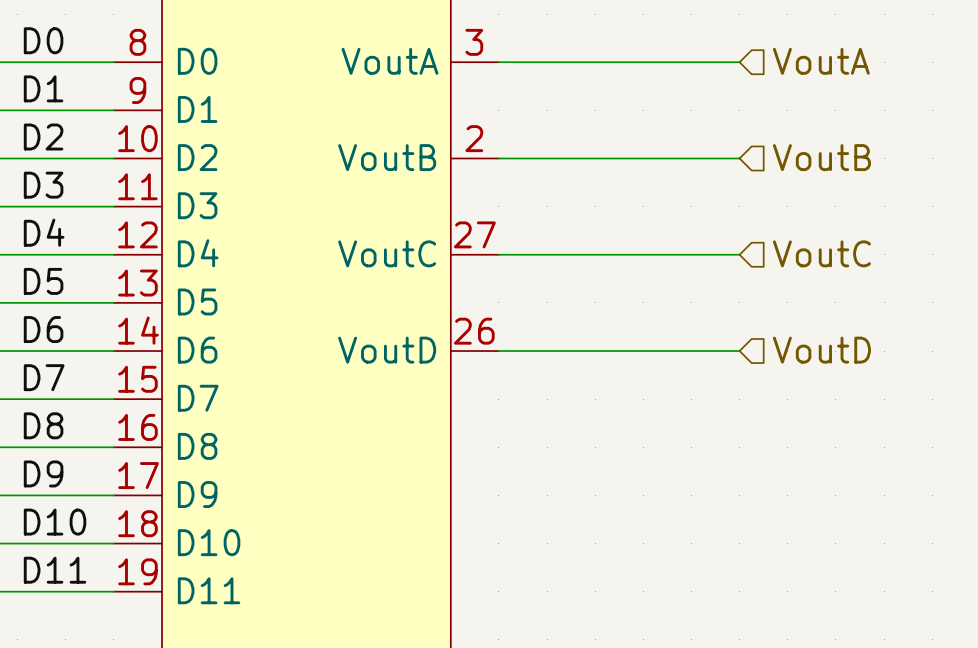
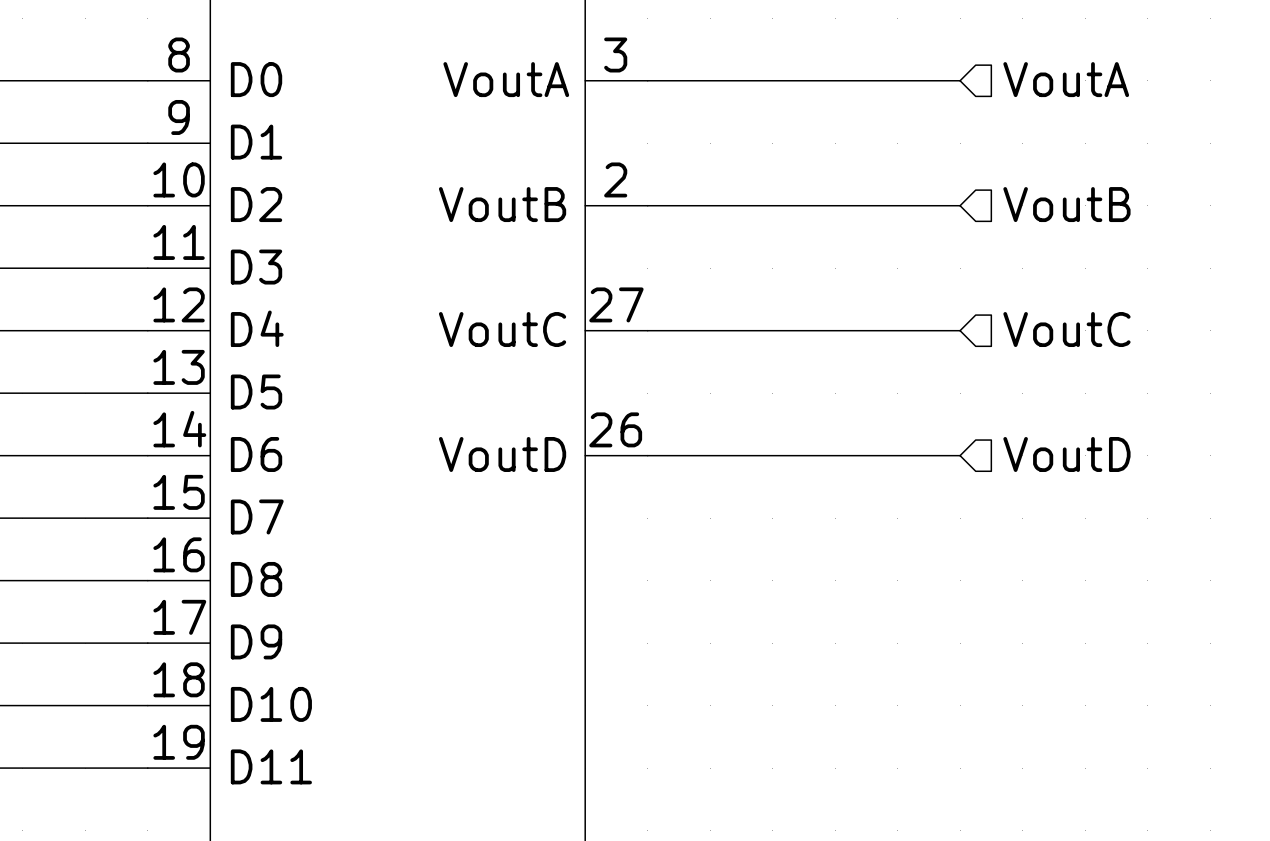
label: D0 (43, 40) -> none
label: D1 (43, 88) -> none
label: D2 (43, 137) -> none
label: D3 (43, 185) -> none
label: D4 (44, 232) -> none
label: D5 (43, 281) -> none
label: D6 (43, 329) -> none
label: D7 (44, 377) -> none
label: D8 (43, 425) -> none
label: D9 (43, 473) -> none
label: D10 (55, 522) -> none
label: D11 (55, 570) -> none

